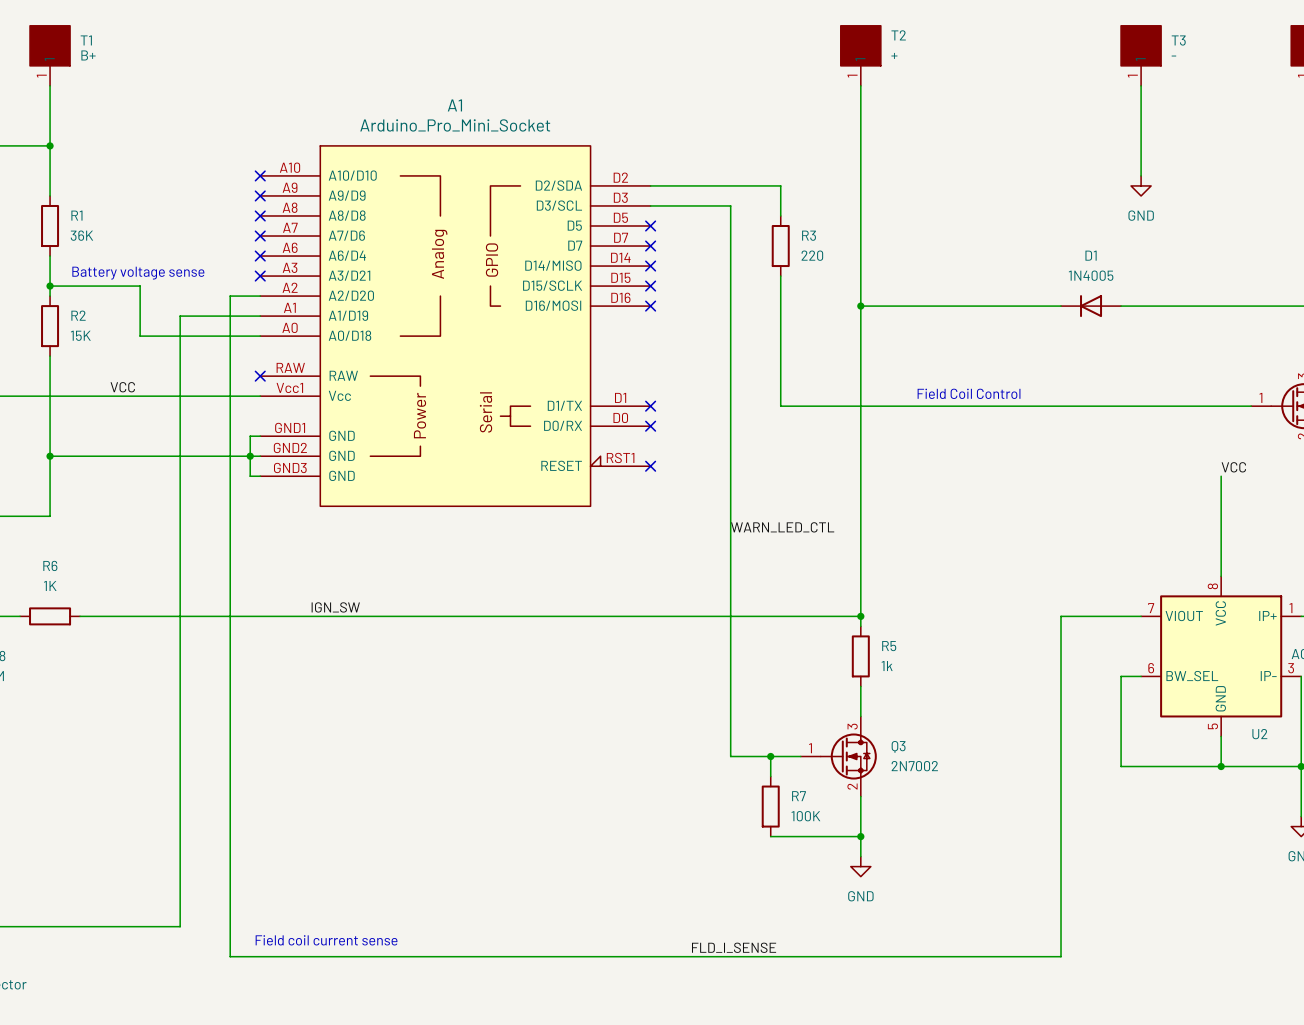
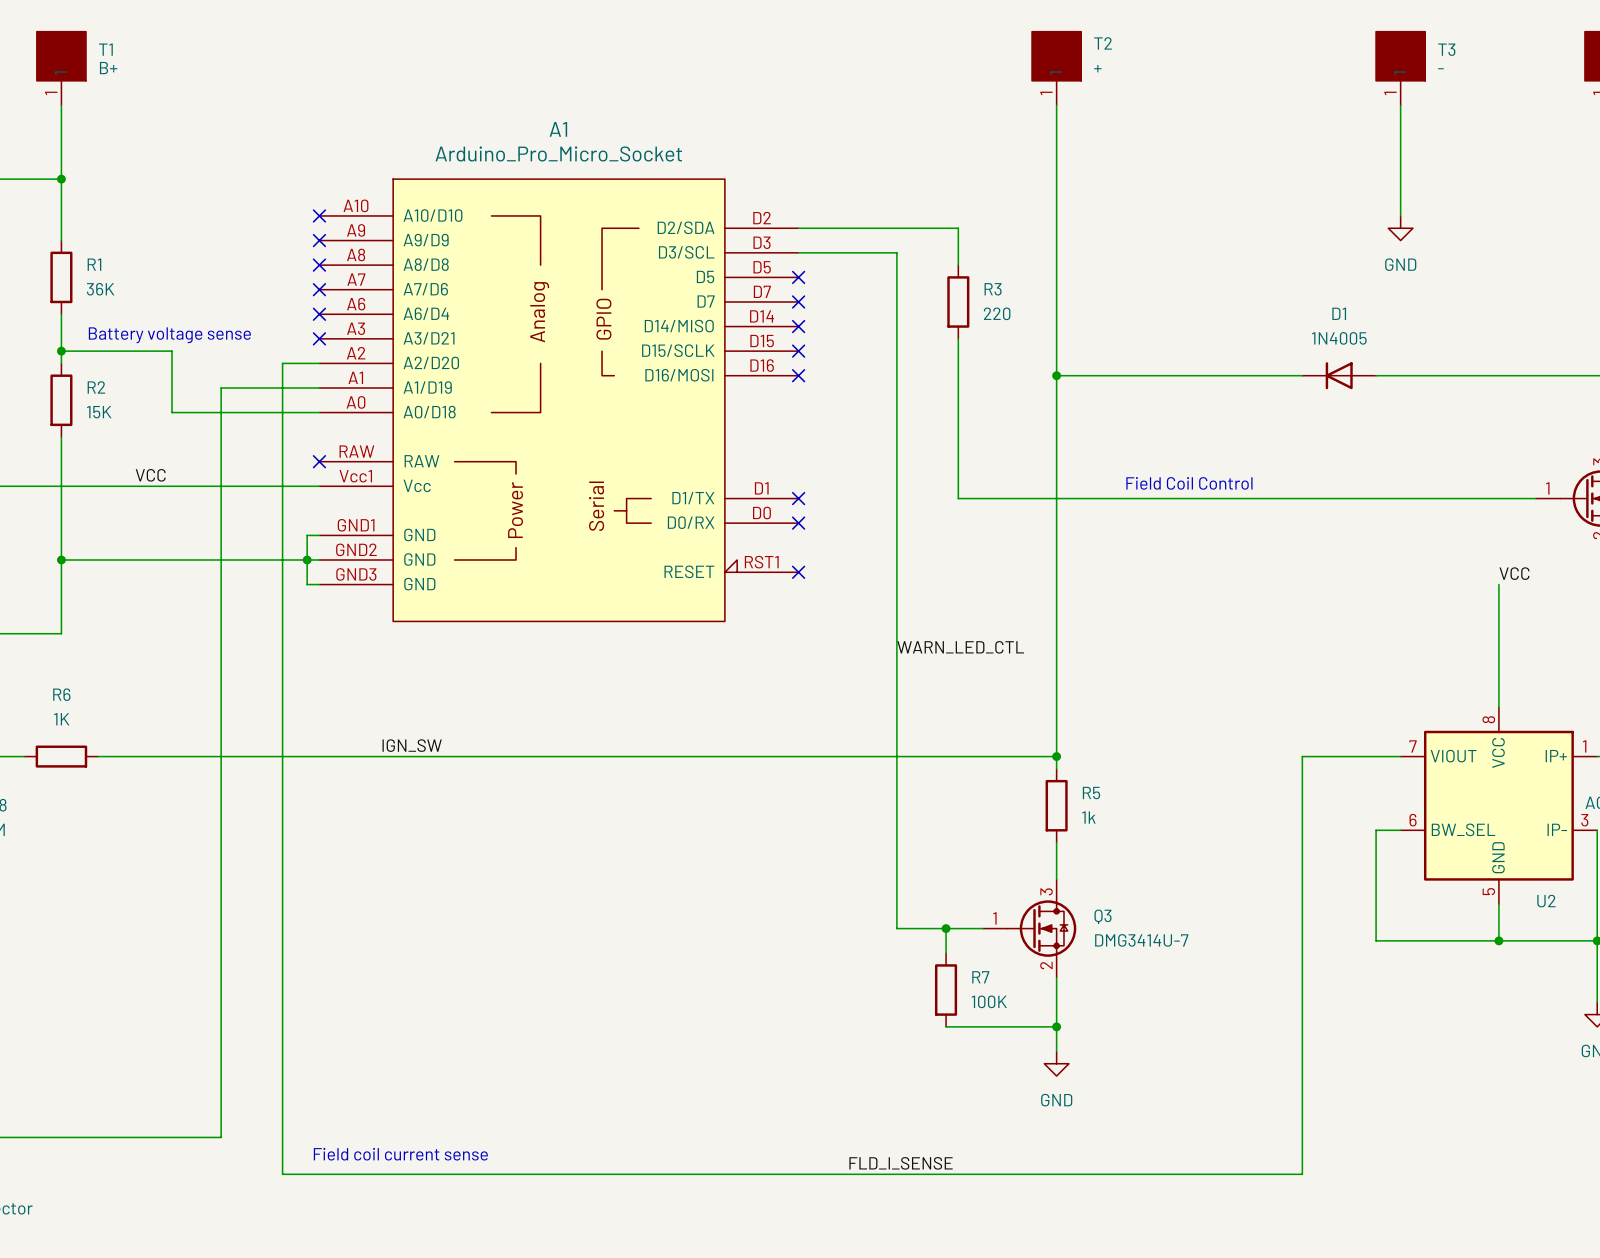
A1 value: Arduino_Pro_Mini_Socket (455, 125) -> Arduino_Pro_Micro_Socket (558, 153)
Q3 value: 2N7002 (914, 766) -> DMG3414U-7 (1141, 940)

